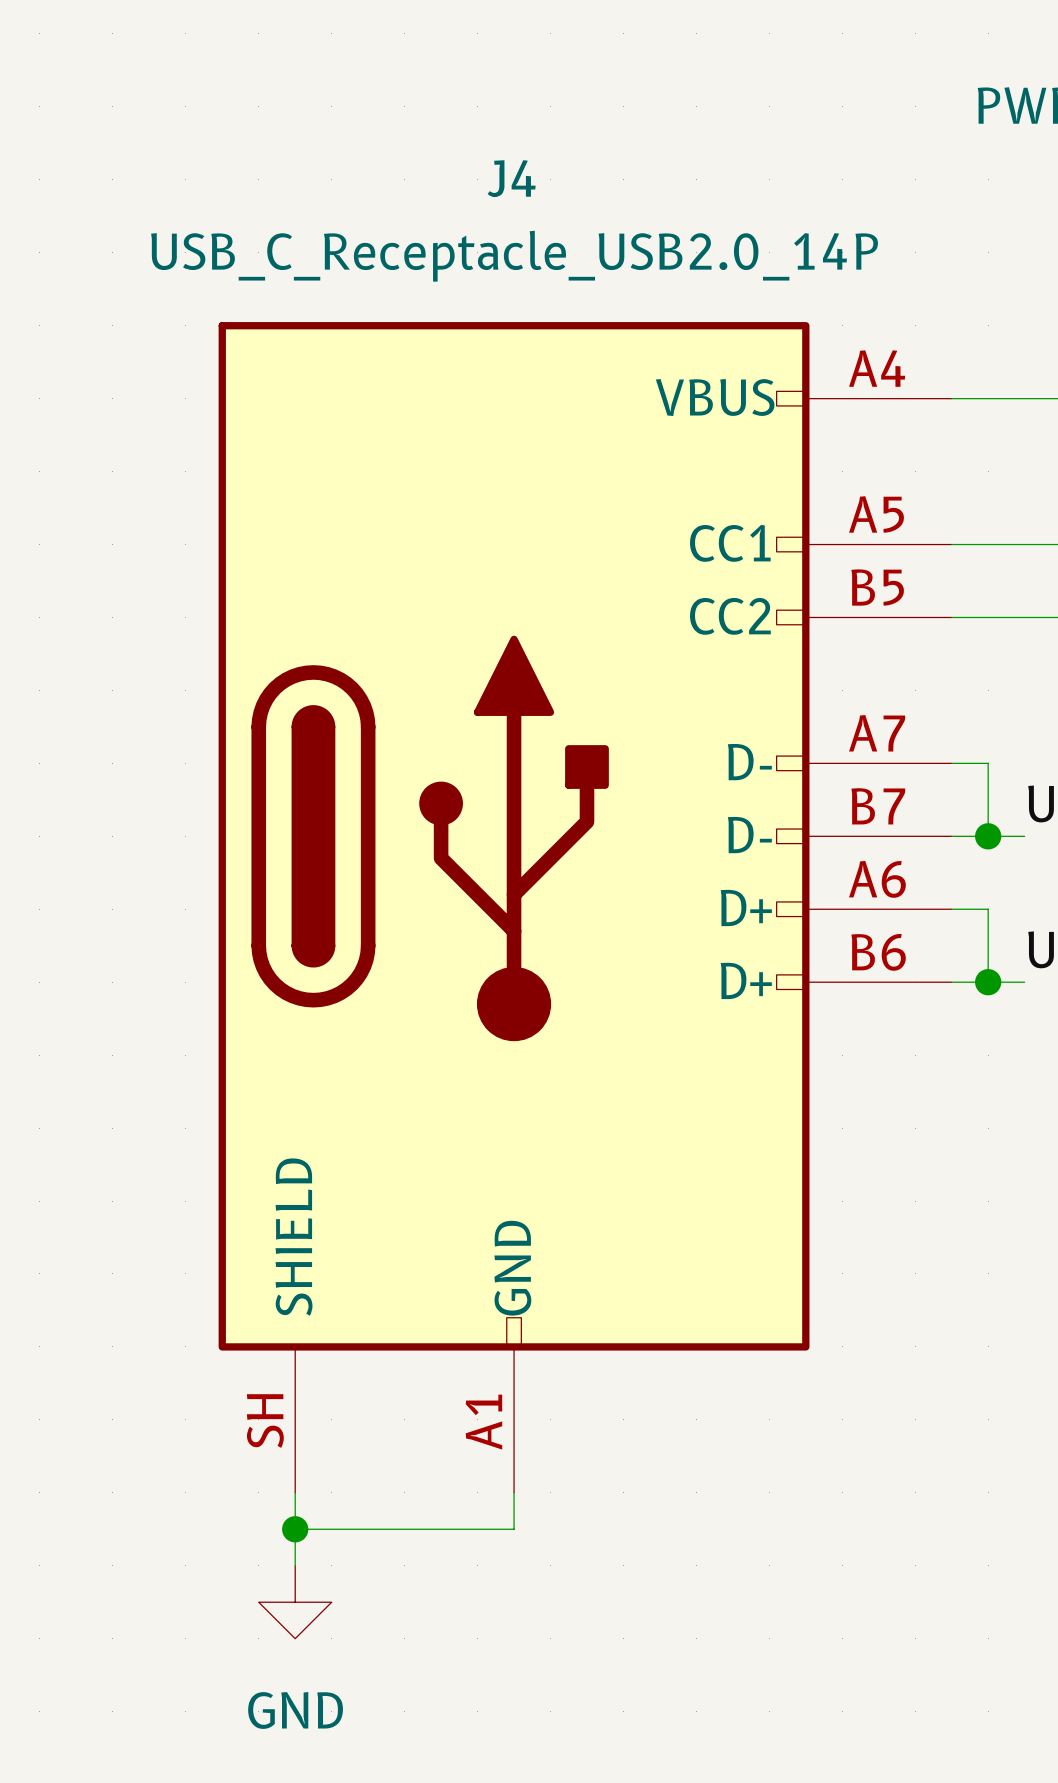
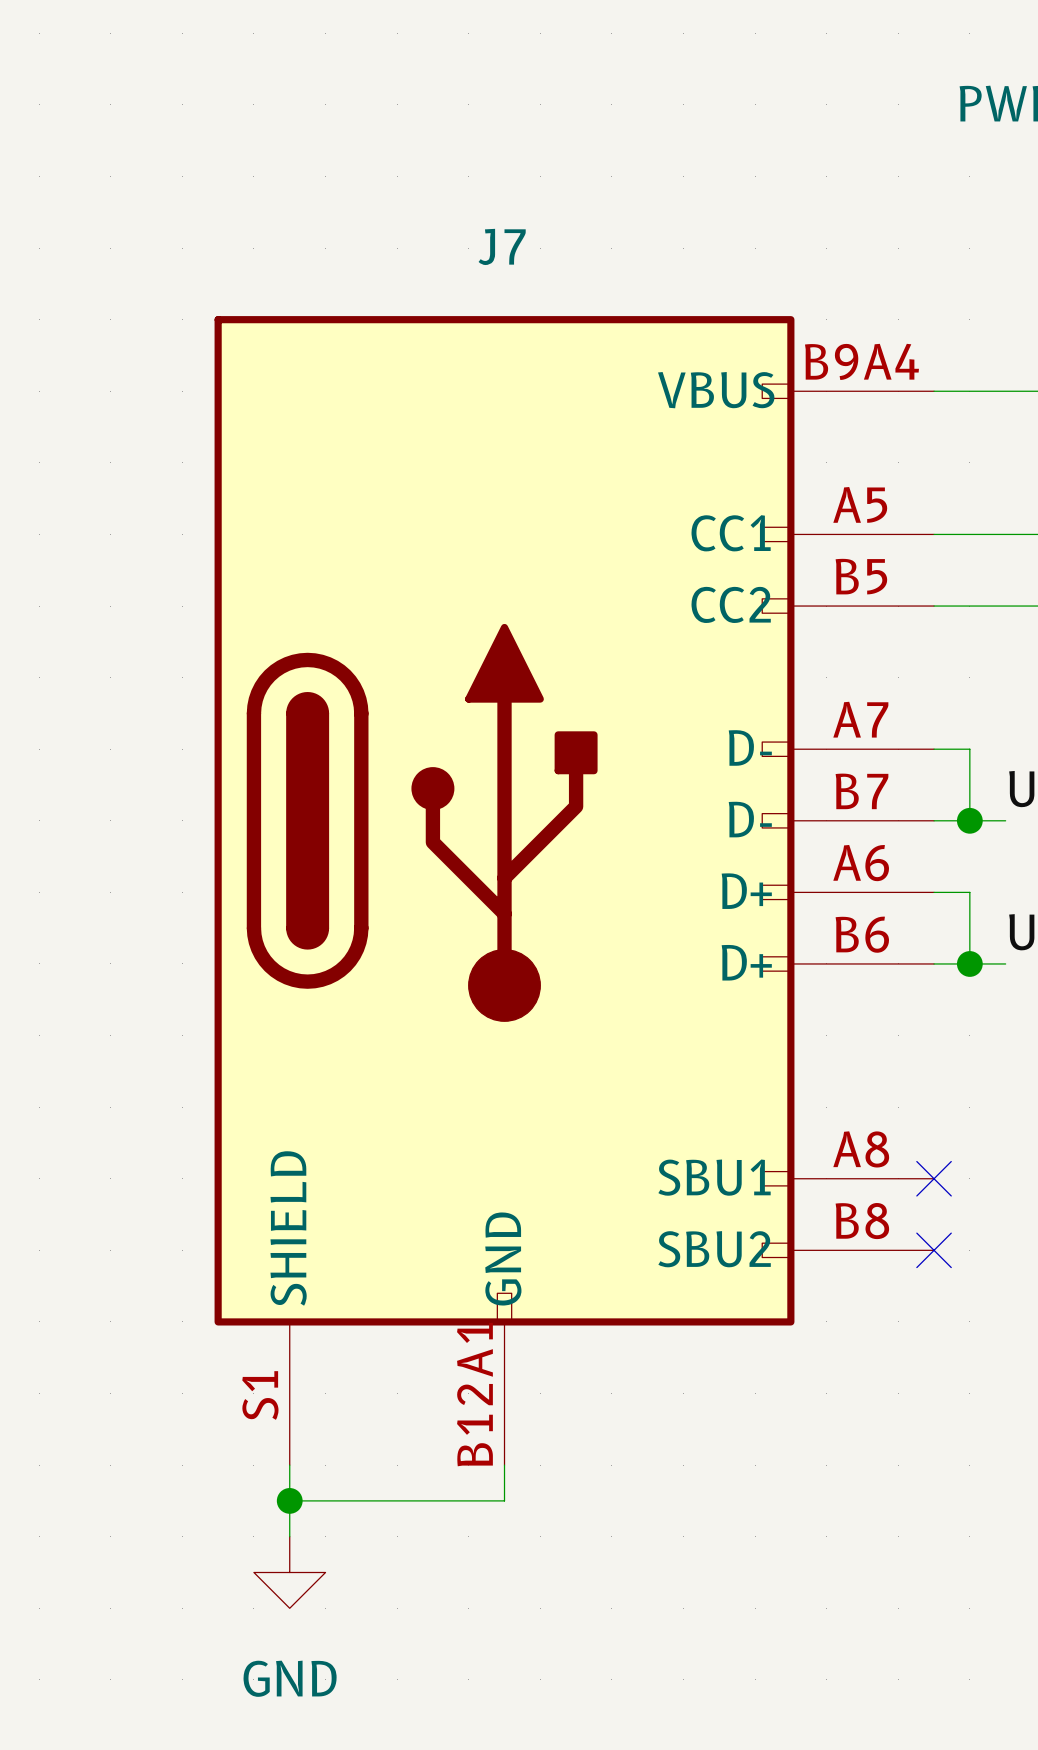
J4: USB_C_Receptacle_USB2.0_14P (585, 907) -> none
J7: none -> (574, 890)
no-connect mark: none -> (934, 1178)
no-connect mark: none -> (934, 1250)

